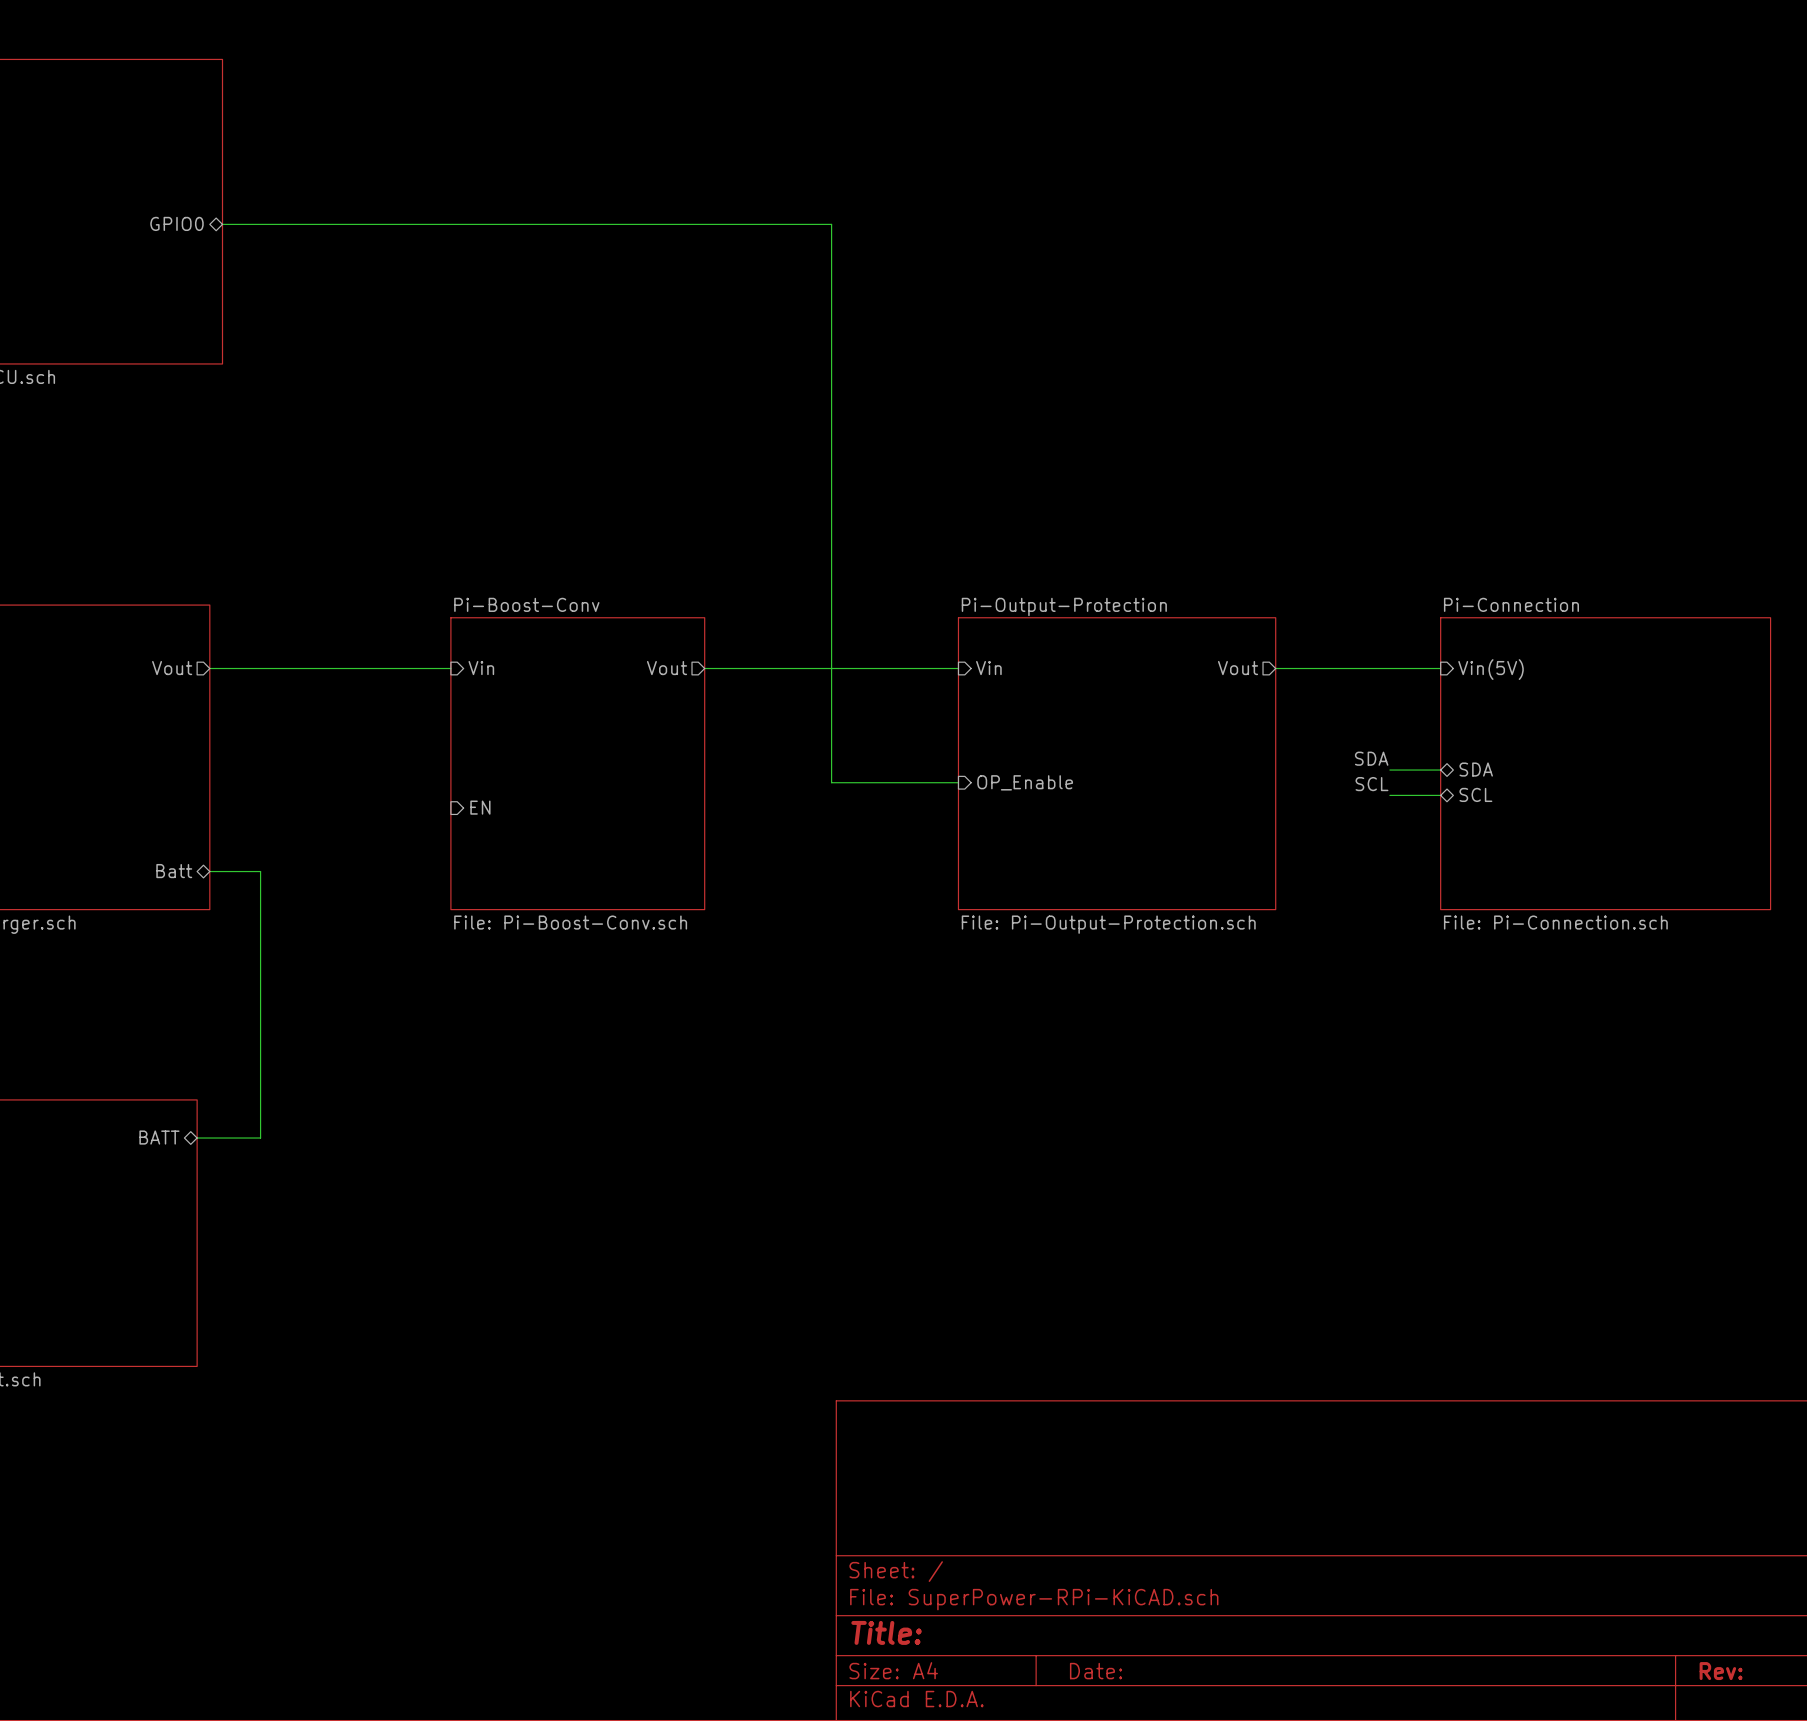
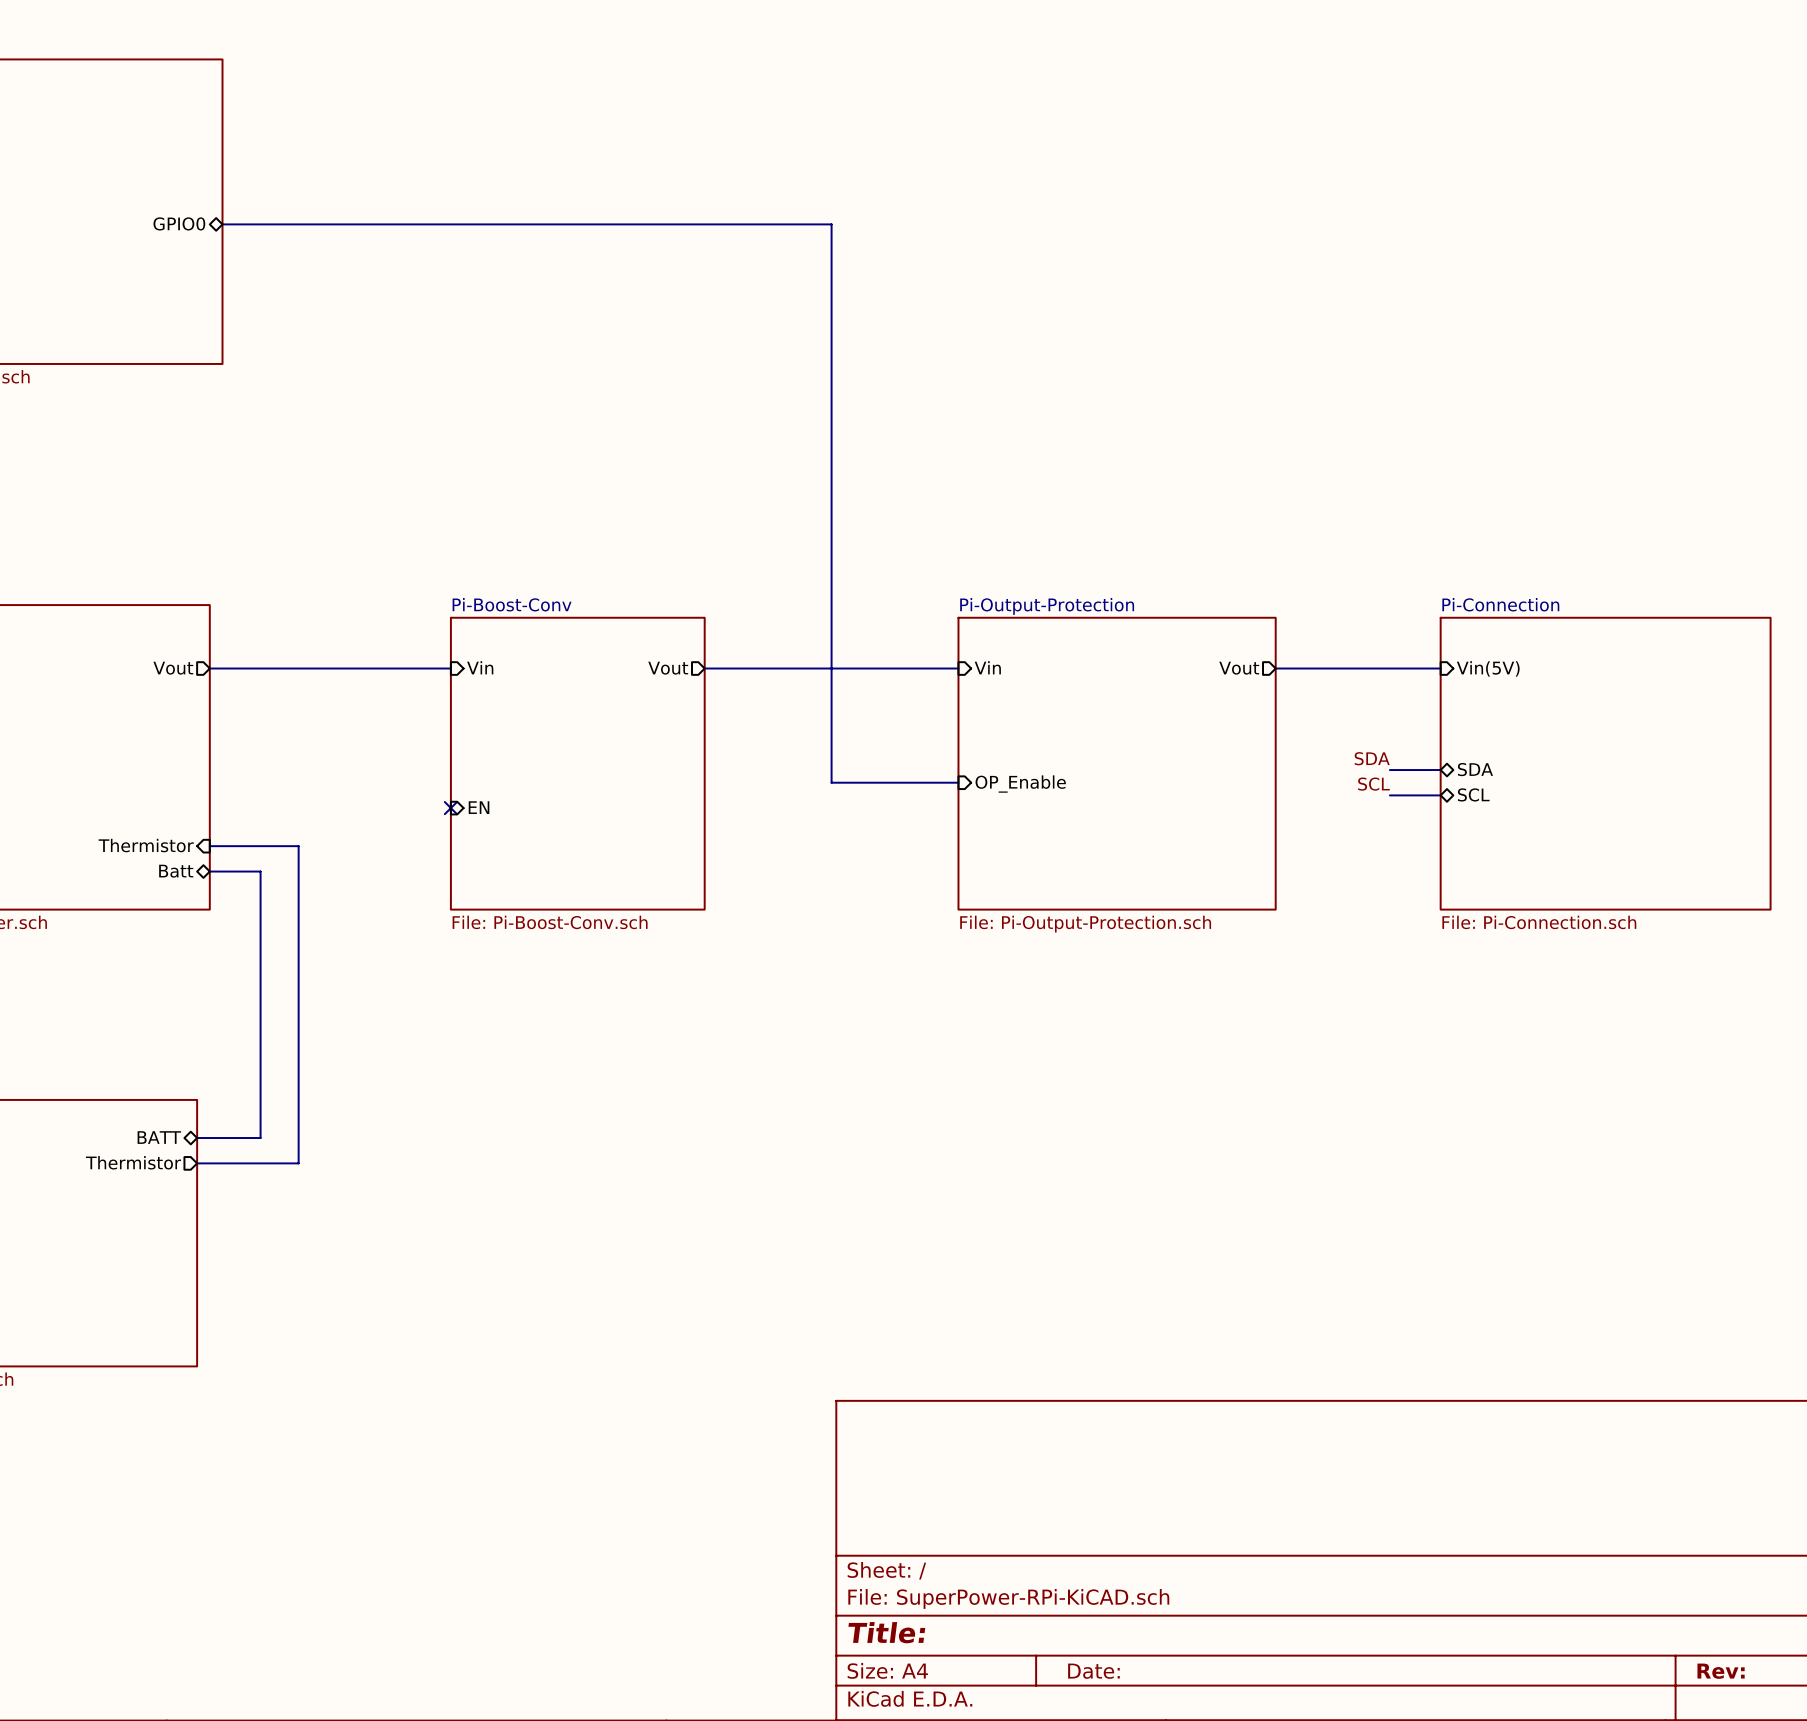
no-connect mark: none -> (450, 808)
sheet pin: none -> Thermistor (146, 845)
wire: none -> (209, 846) (298, 846) (298, 1163) (197, 1163)
sheet pin: none -> Thermistor (133, 1162)

